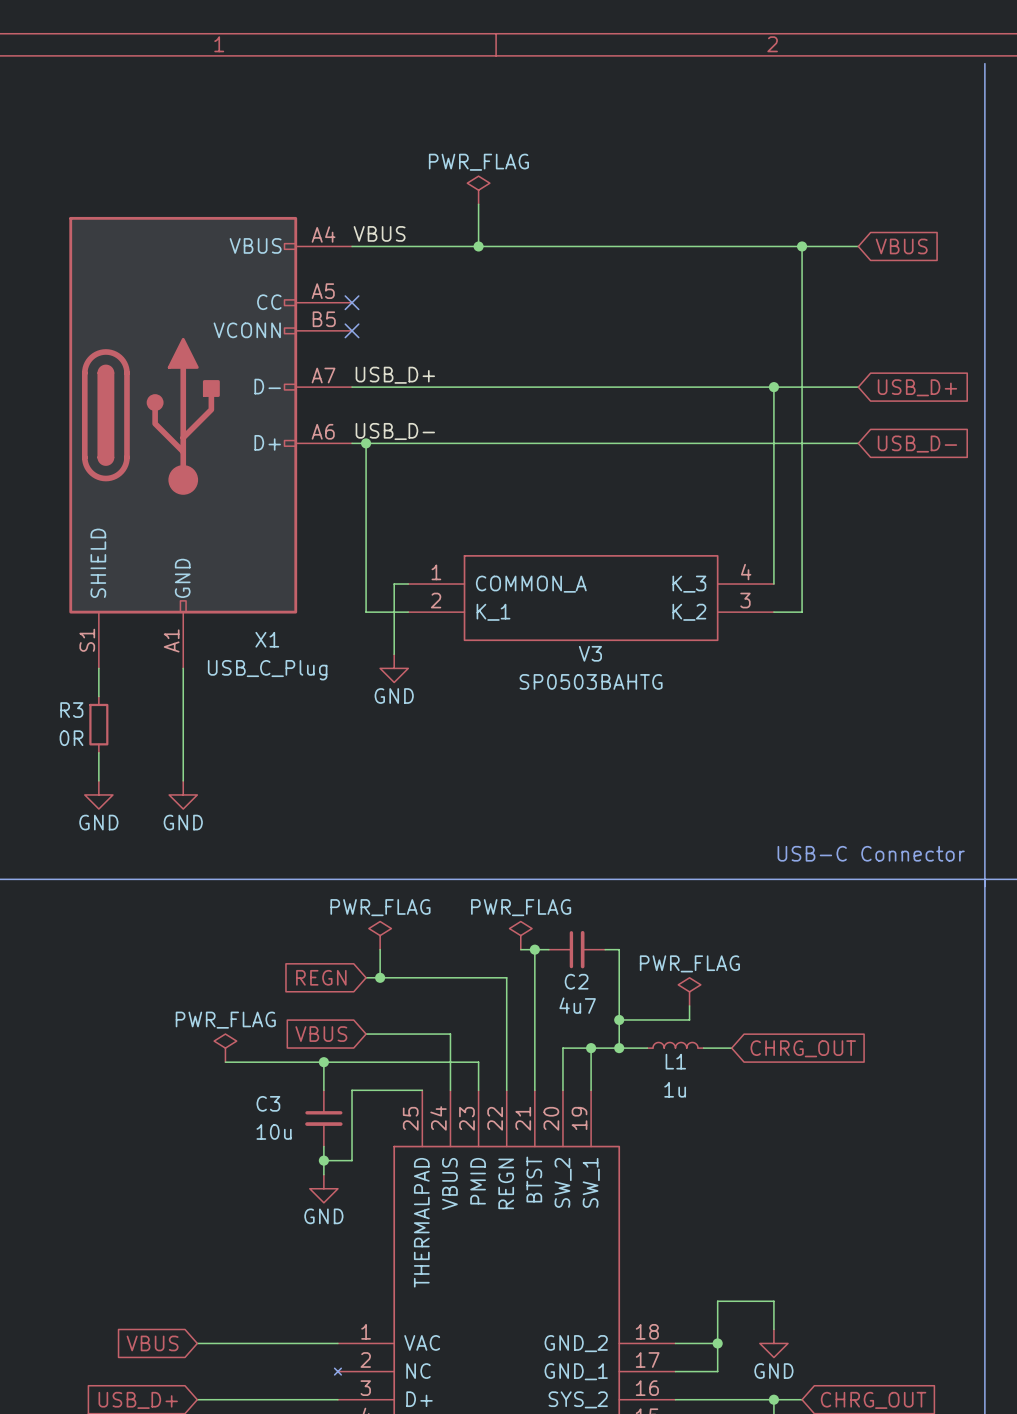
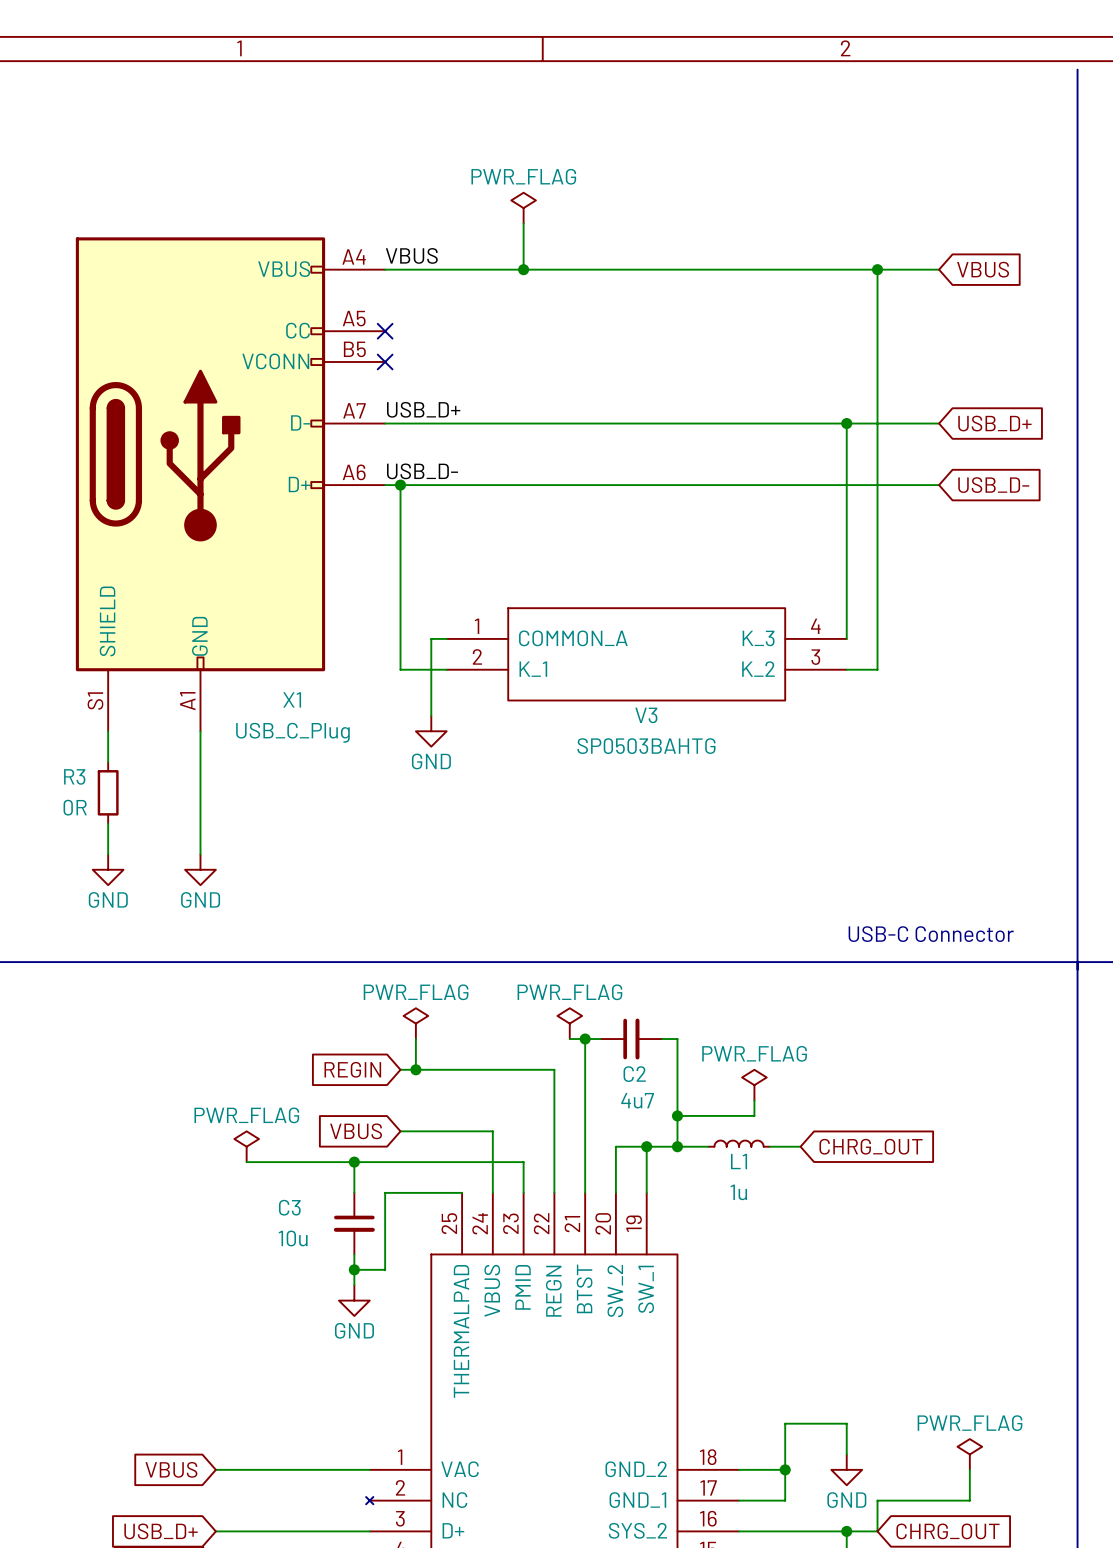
global label: REGN (321, 977) -> REGIN (352, 1069)
power symbol: none -> PWR_FLAG (969, 1454)
wire: none -> (969, 1469) (969, 1500) (877, 1500) (877, 1531)

